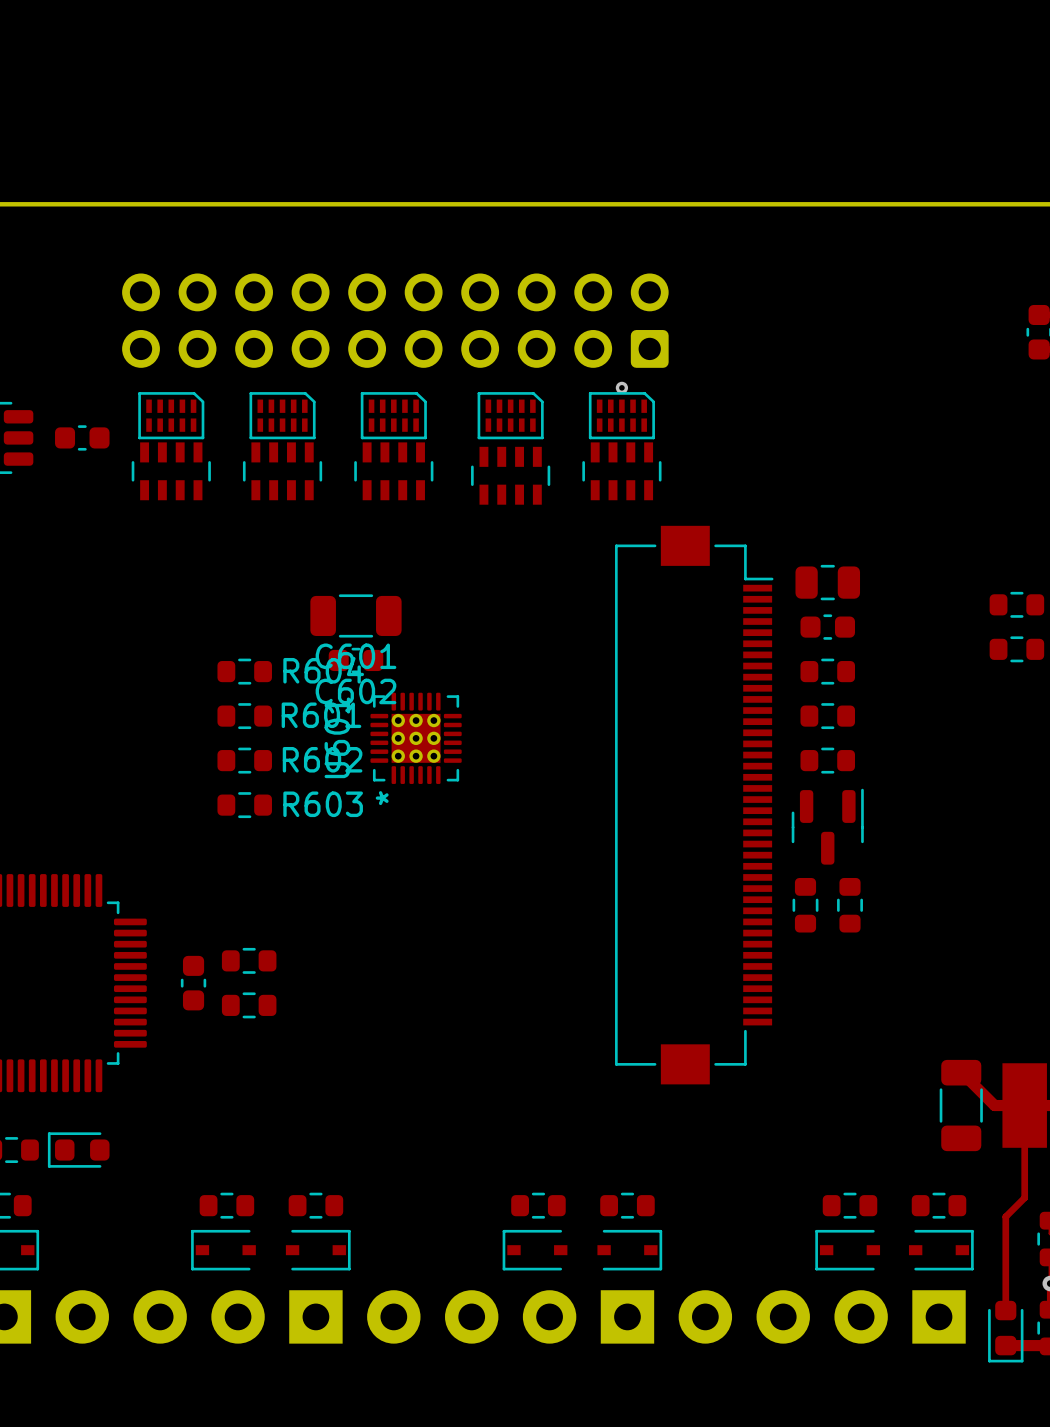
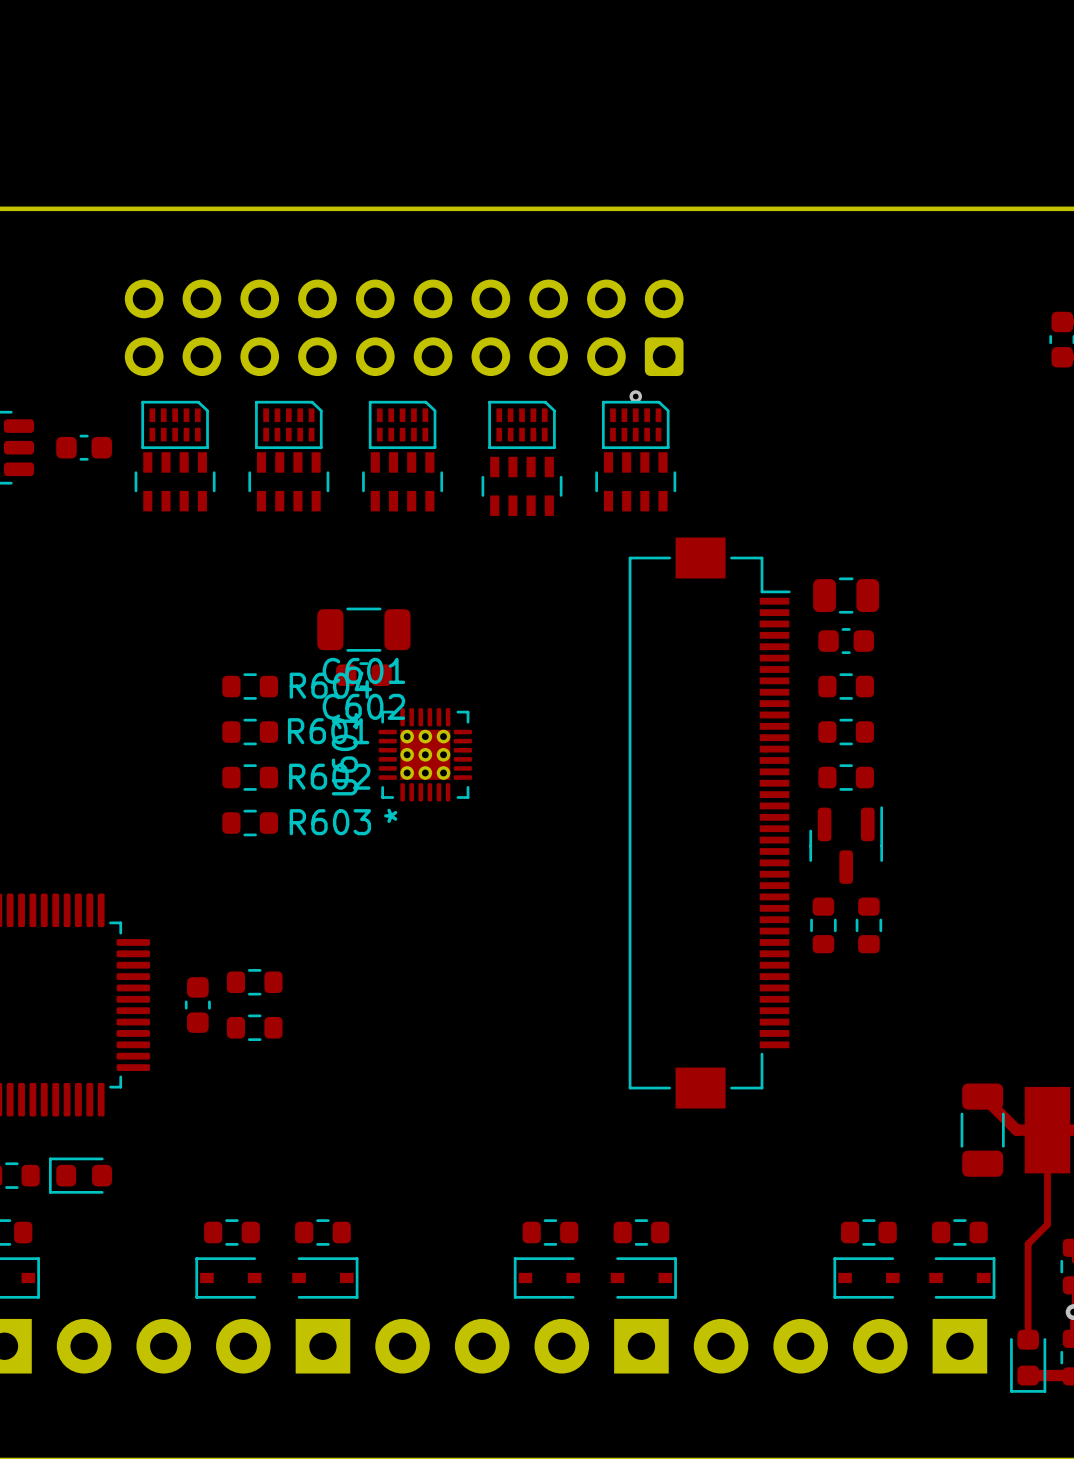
part: (1016, 604) -> none
part: (1016, 649) -> none

